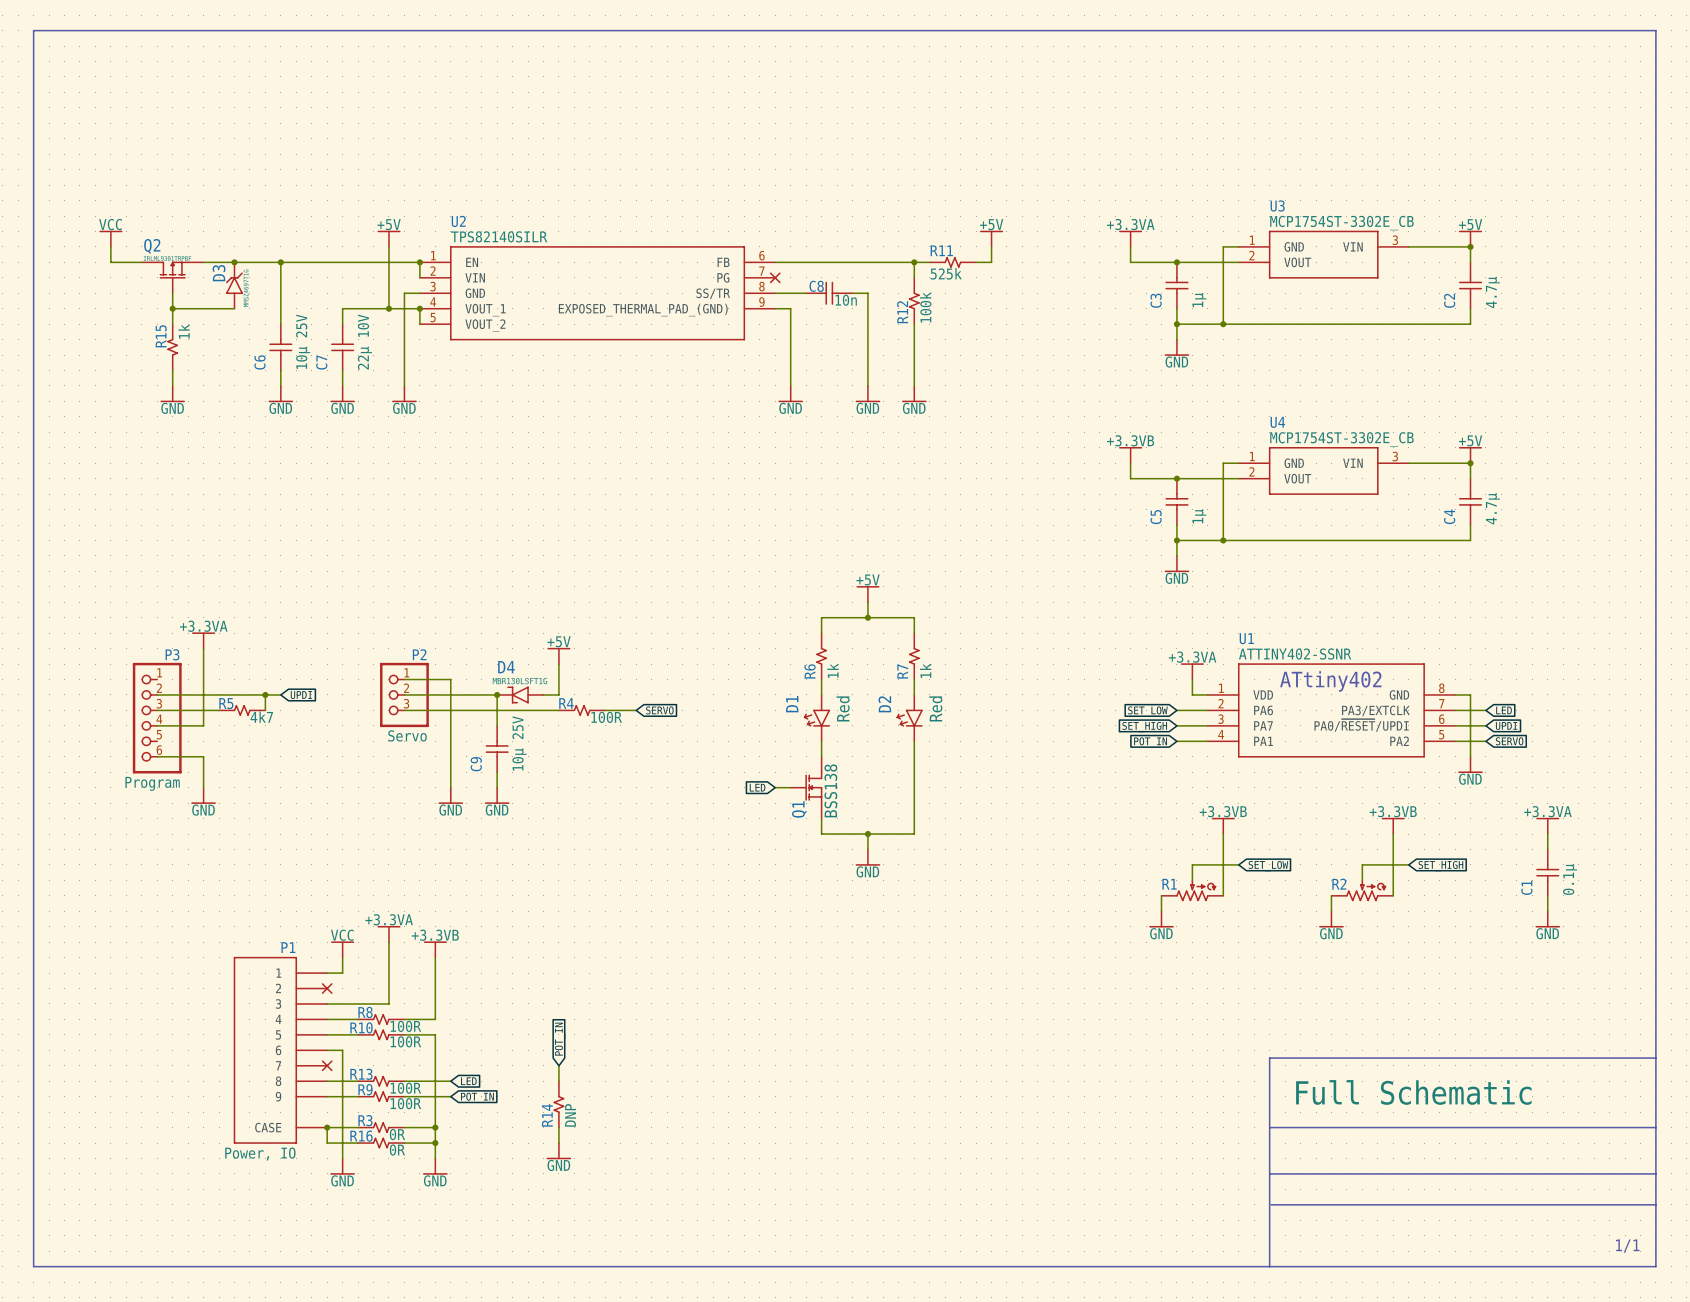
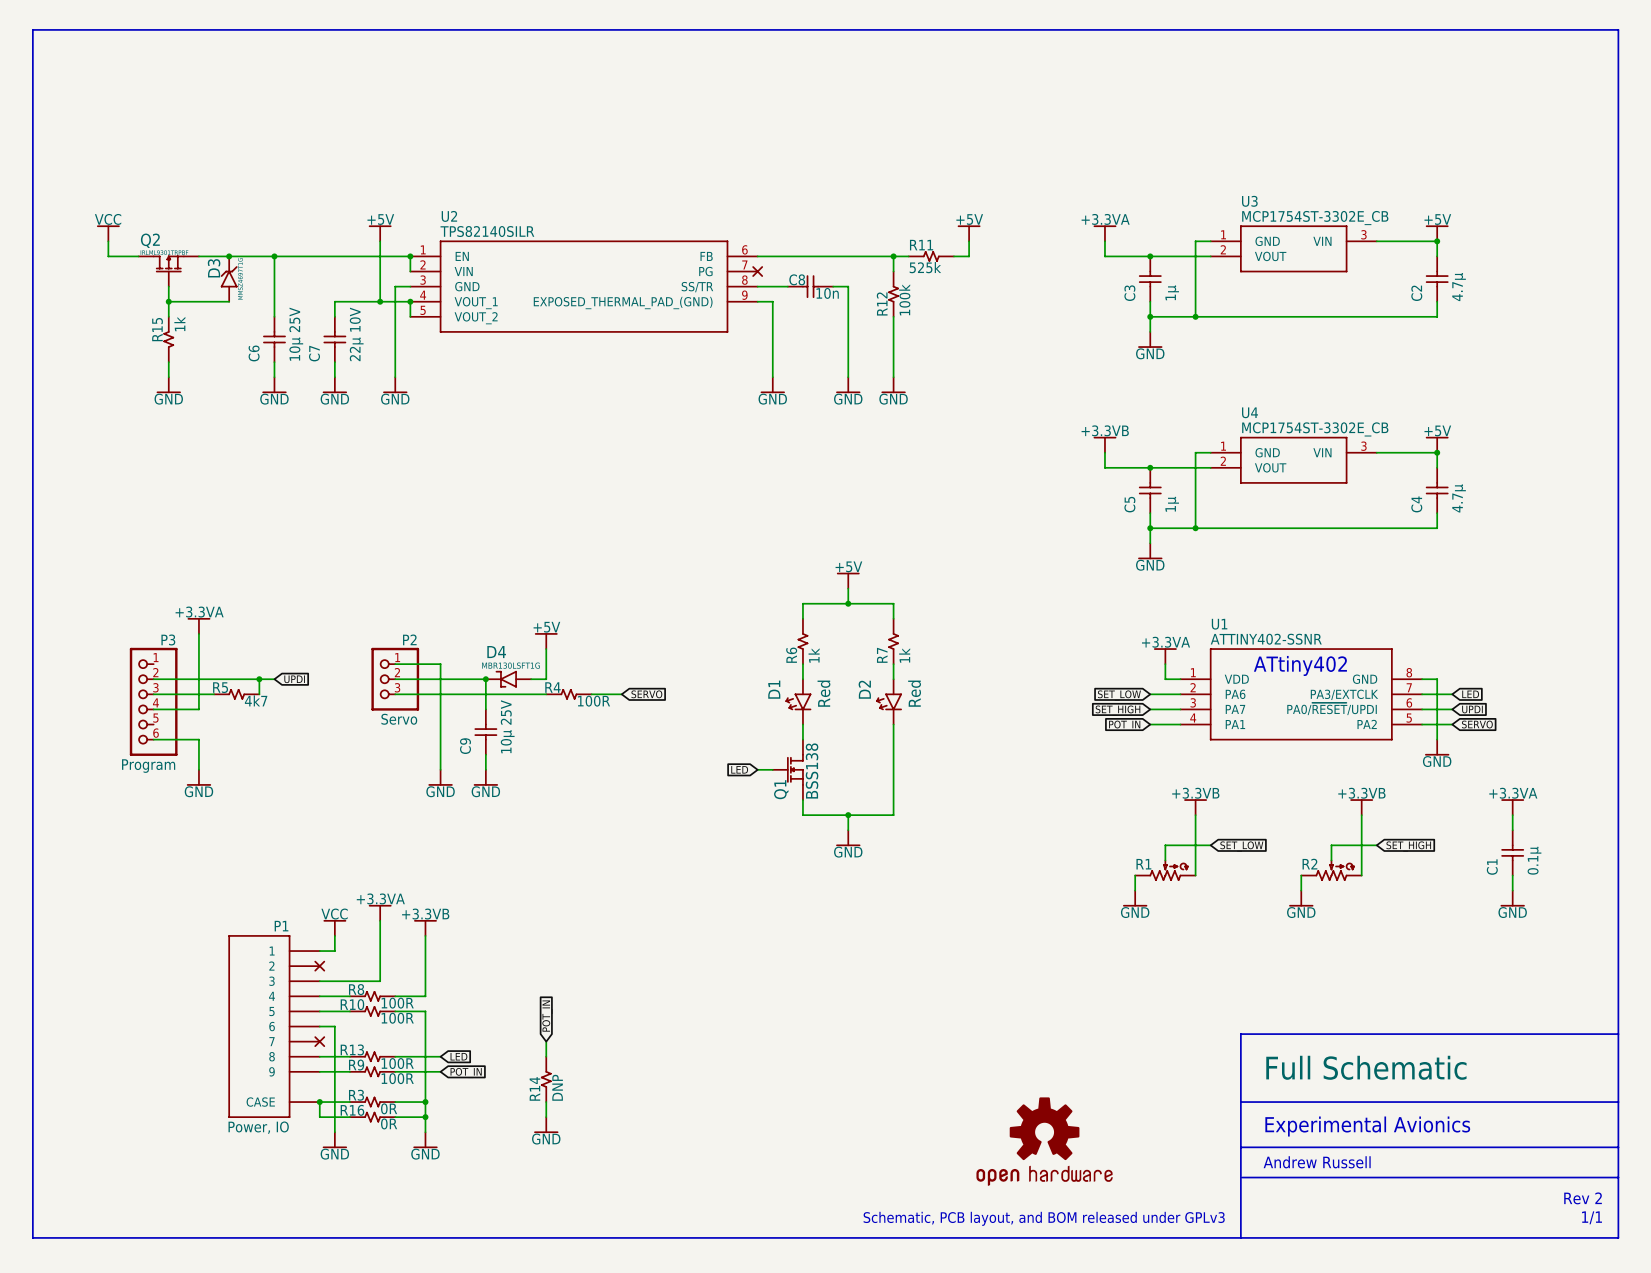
part text: none -> Experimental Avionics (1367, 1126)
part: none -> (1044, 1141)
part text: none -> Andrew Russell (1317, 1162)
part text: none -> Rev 2 (1583, 1198)
text: none -> Schematic, PCB layout, and BOM released under GPLv3 (1044, 1218)

